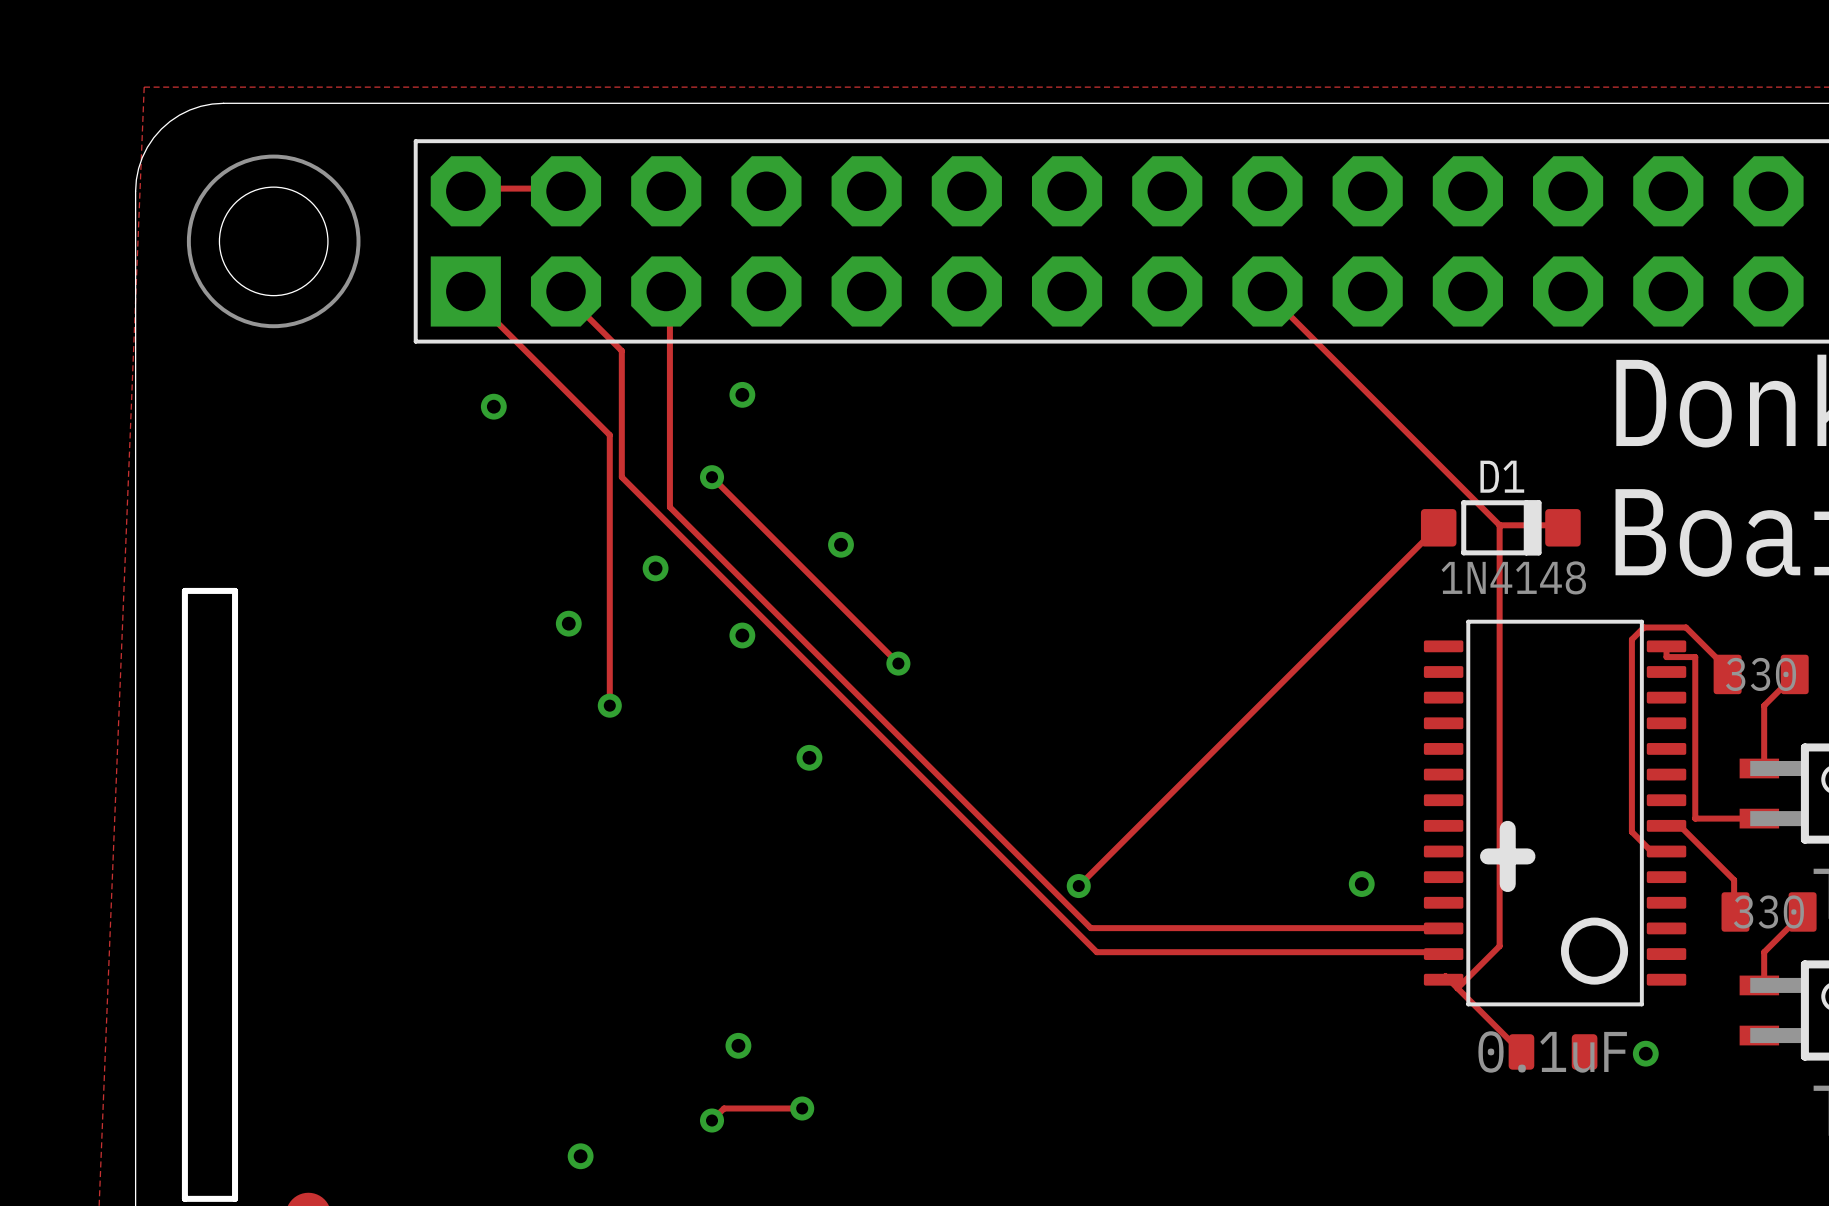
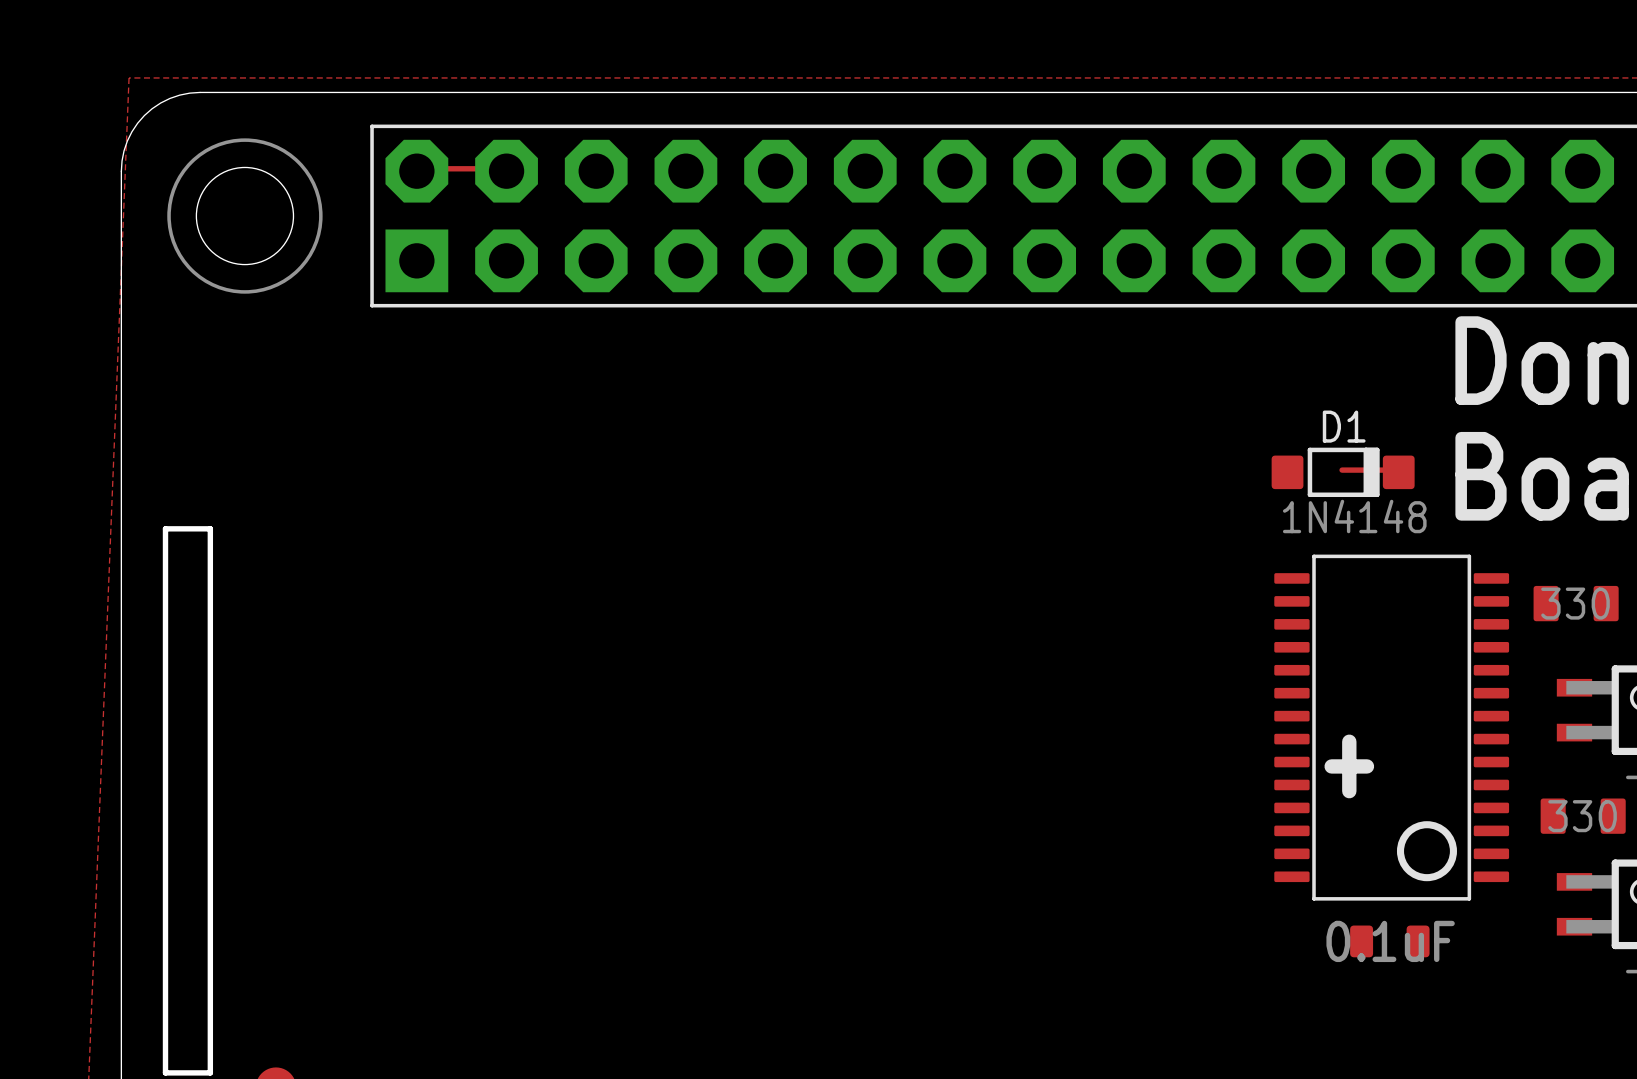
track: (465, 291) (609, 435) (609, 705) -> none
track: (566, 291) (567, 296) (621, 350) (621, 477) (1096, 952) (1439, 952) (1443, 954) -> none
track: (666, 291) (669, 296) (669, 507) (1090, 928) (1443, 928) -> none
track: (1267, 291) (1499, 525) (1499, 946) (1457, 988) -> none
via: (742, 394) -> none
via: (493, 406) -> none
track: (712, 477) (898, 663) -> none
via: (712, 477) -> none
track: (1438, 527) (1078, 886) -> none
via: (841, 544) -> none
via: (655, 568) -> none
via: (568, 623) -> none
via: (742, 635) -> none
track: (1666, 646) (1666, 657) (1695, 657) (1695, 818) (1759, 818) -> none
via: (898, 663) -> none
track: (1727, 674) (1728, 669) (1686, 627) (1643, 627) (1631, 639) (1631, 831) (1649, 849) (1666, 851) -> none
track: (1794, 674) (1764, 705) (1764, 765) (1759, 768) -> none
via: (609, 705) -> none
via: (809, 757) -> none
track: (1666, 825) (1680, 825) (1734, 880) (1735, 911) -> none
via: (1361, 884) -> none
via: (1078, 886) -> none
track: (1802, 911) (1764, 952) (1764, 982) (1759, 985) -> none
track: (1443, 979) (1445, 976) (1521, 1051) -> none
via: (738, 1045) -> none
via: (1645, 1053) -> none
track: (802, 1108) (724, 1108) (712, 1120) -> none
via: (802, 1108) -> none
via: (712, 1120) -> none
via: (580, 1156) -> none

